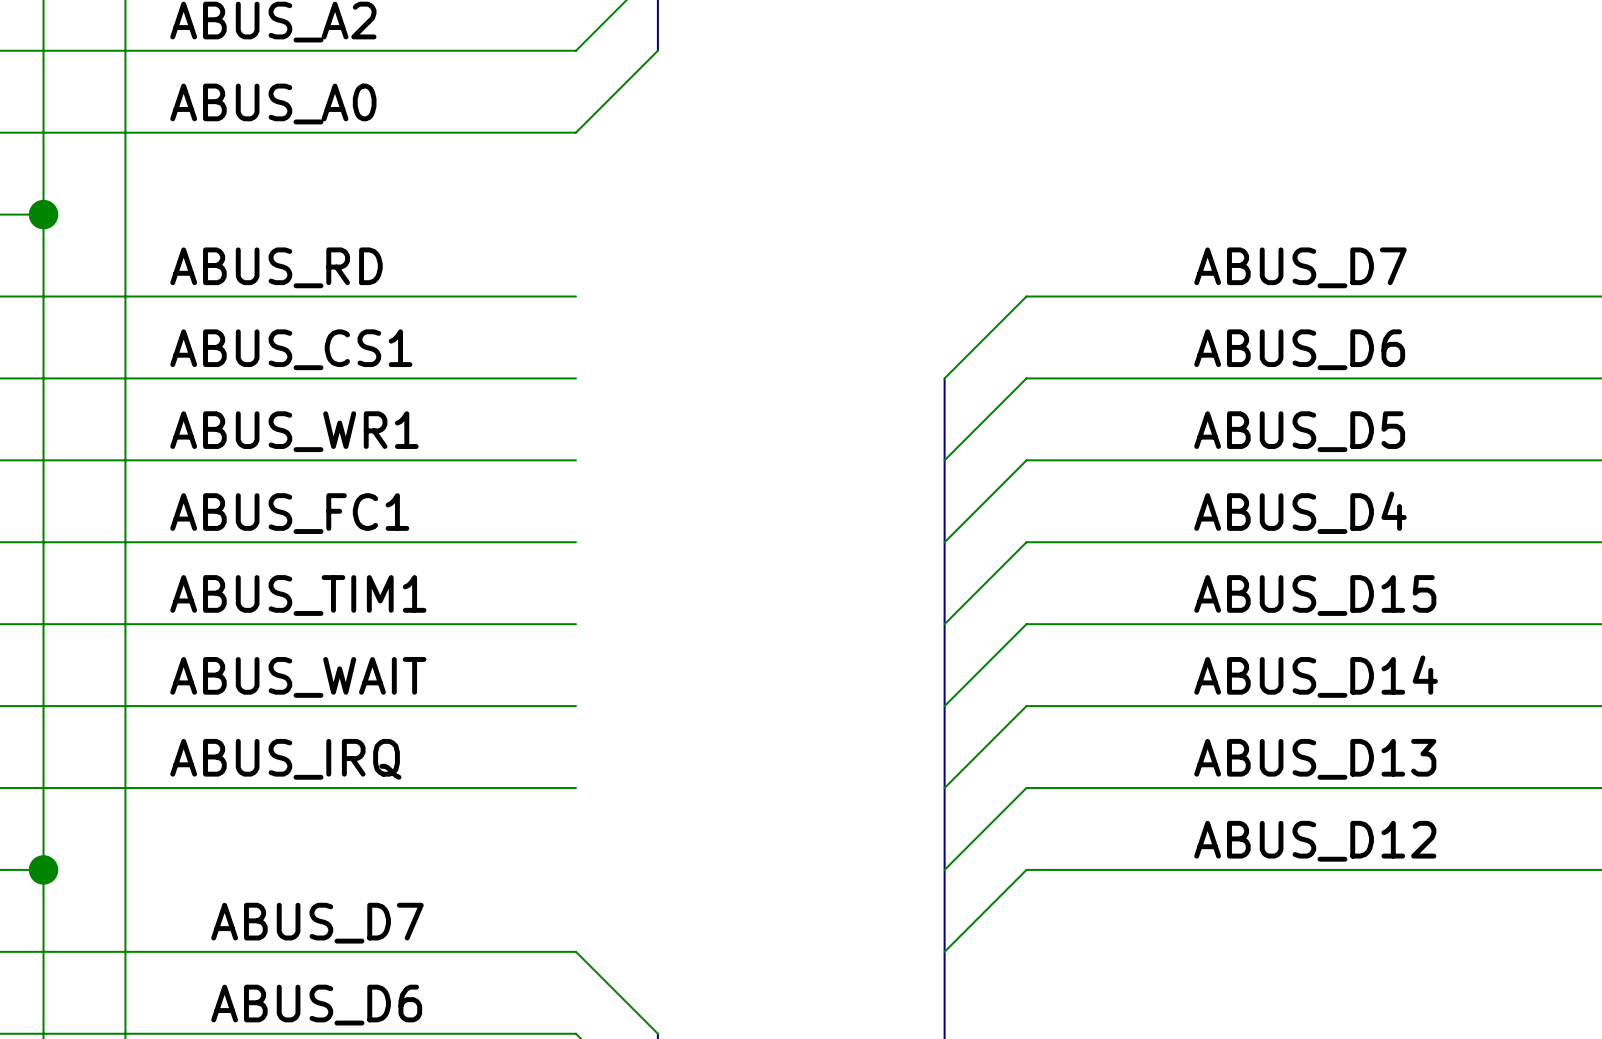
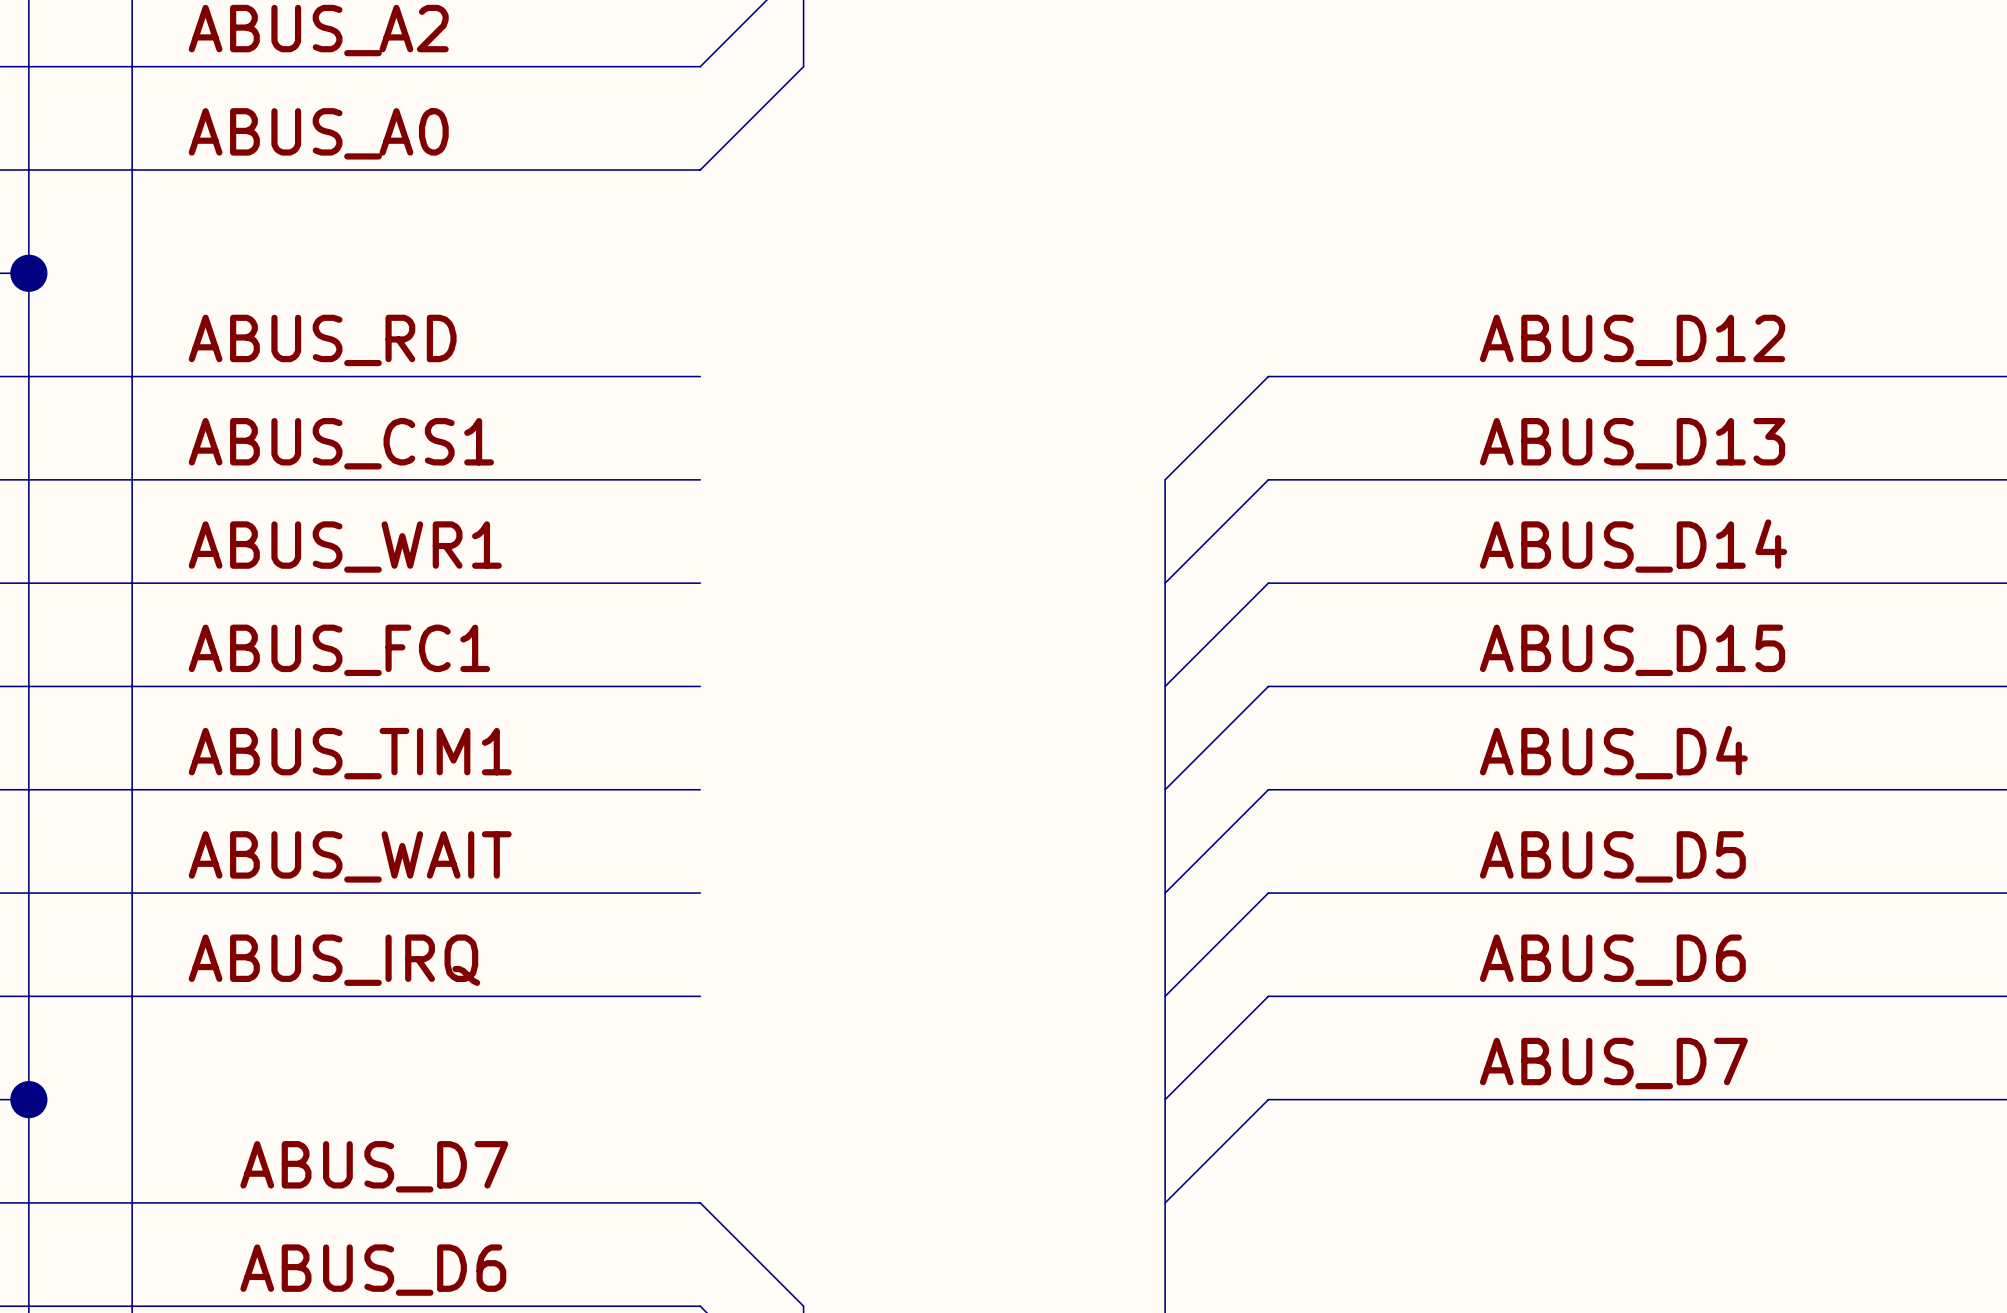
label: ABUS_D7 (1300, 267) -> ABUS_D12 (1632, 340)
label: ABUS_D6 (1299, 349) -> ABUS_D13 (1632, 443)
label: ABUS_D5 (1299, 431) -> ABUS_D14 (1633, 546)
label: ABUS_D4 (1300, 512) -> ABUS_D15 (1632, 650)
label: ABUS_D15 (1315, 595) -> ABUS_D4 (1613, 752)
label: ABUS_D14 (1316, 676) -> ABUS_D5 (1612, 856)
label: ABUS_D13 (1315, 759) -> ABUS_D6 (1612, 960)
label: ABUS_D12 (1315, 841) -> ABUS_D7 (1613, 1063)

